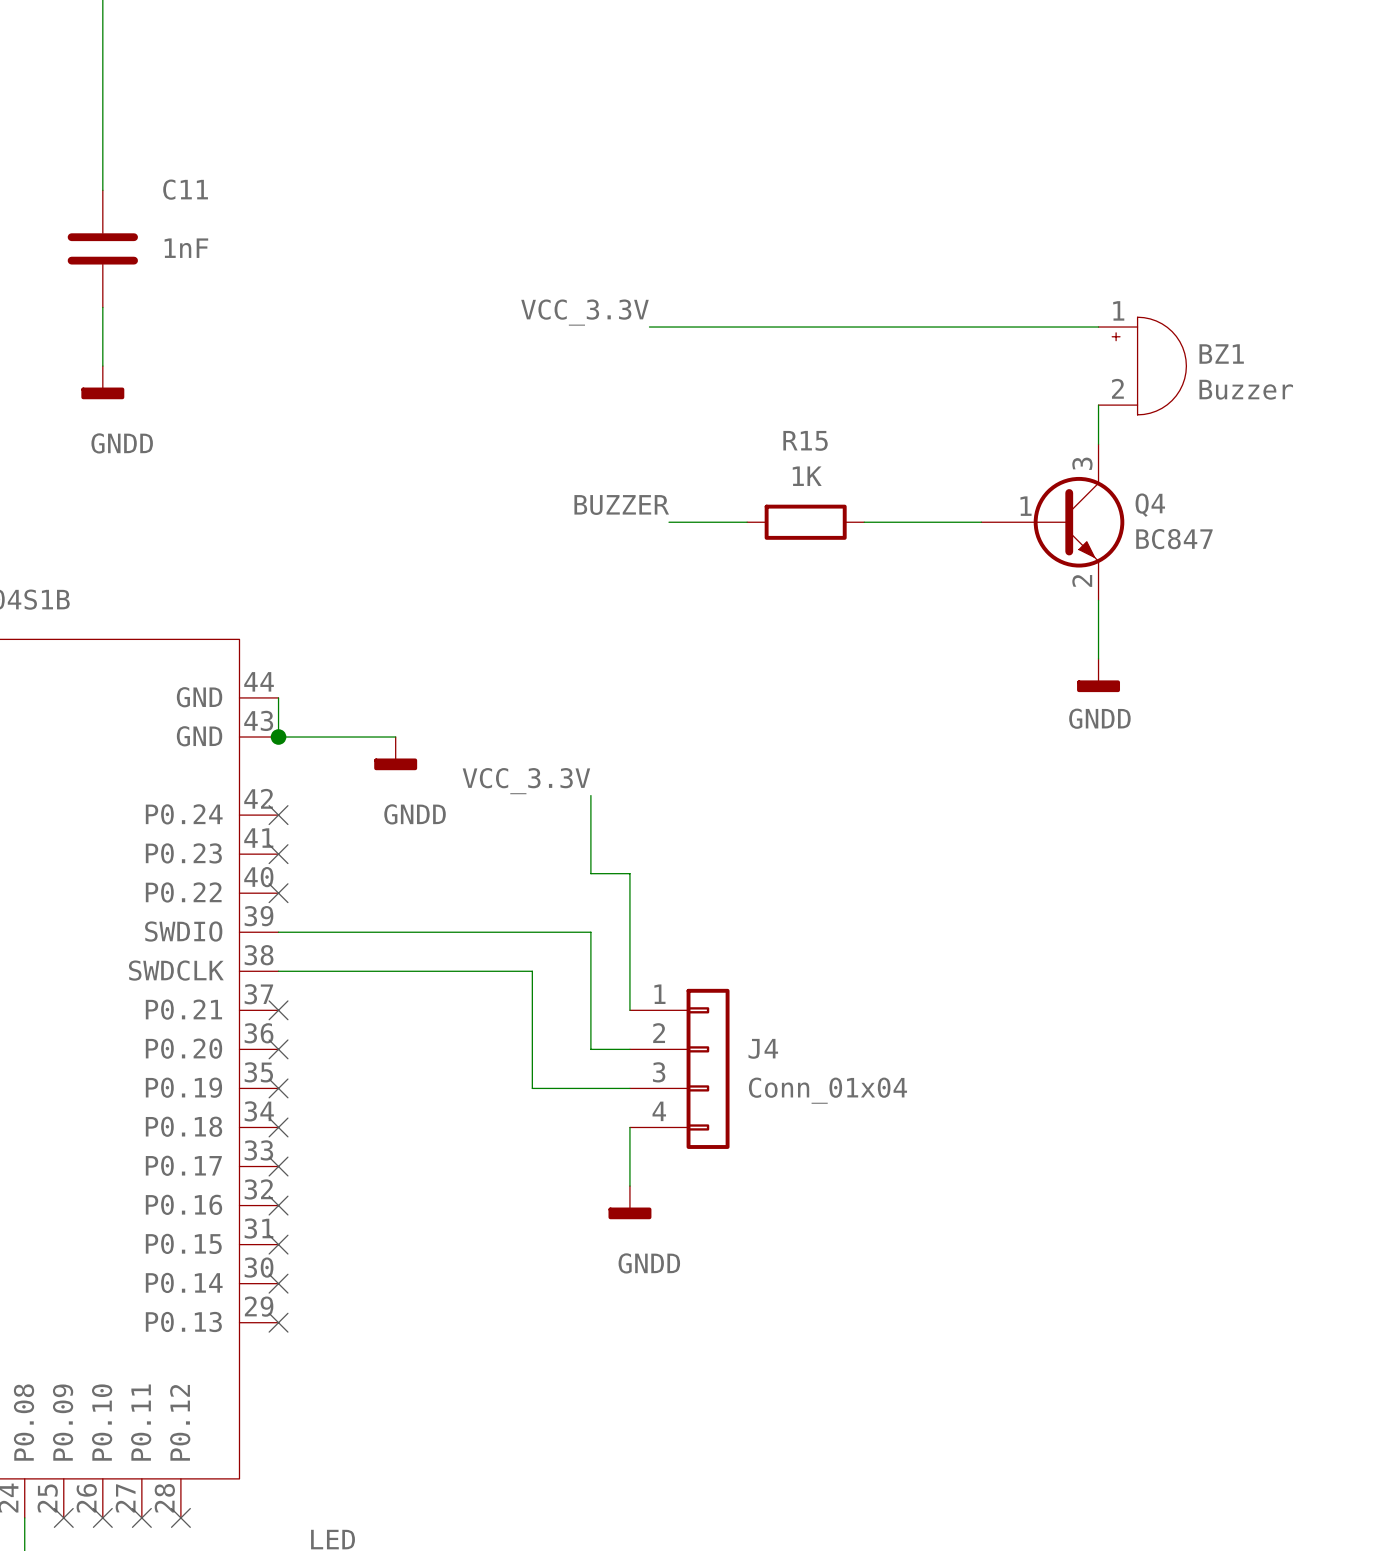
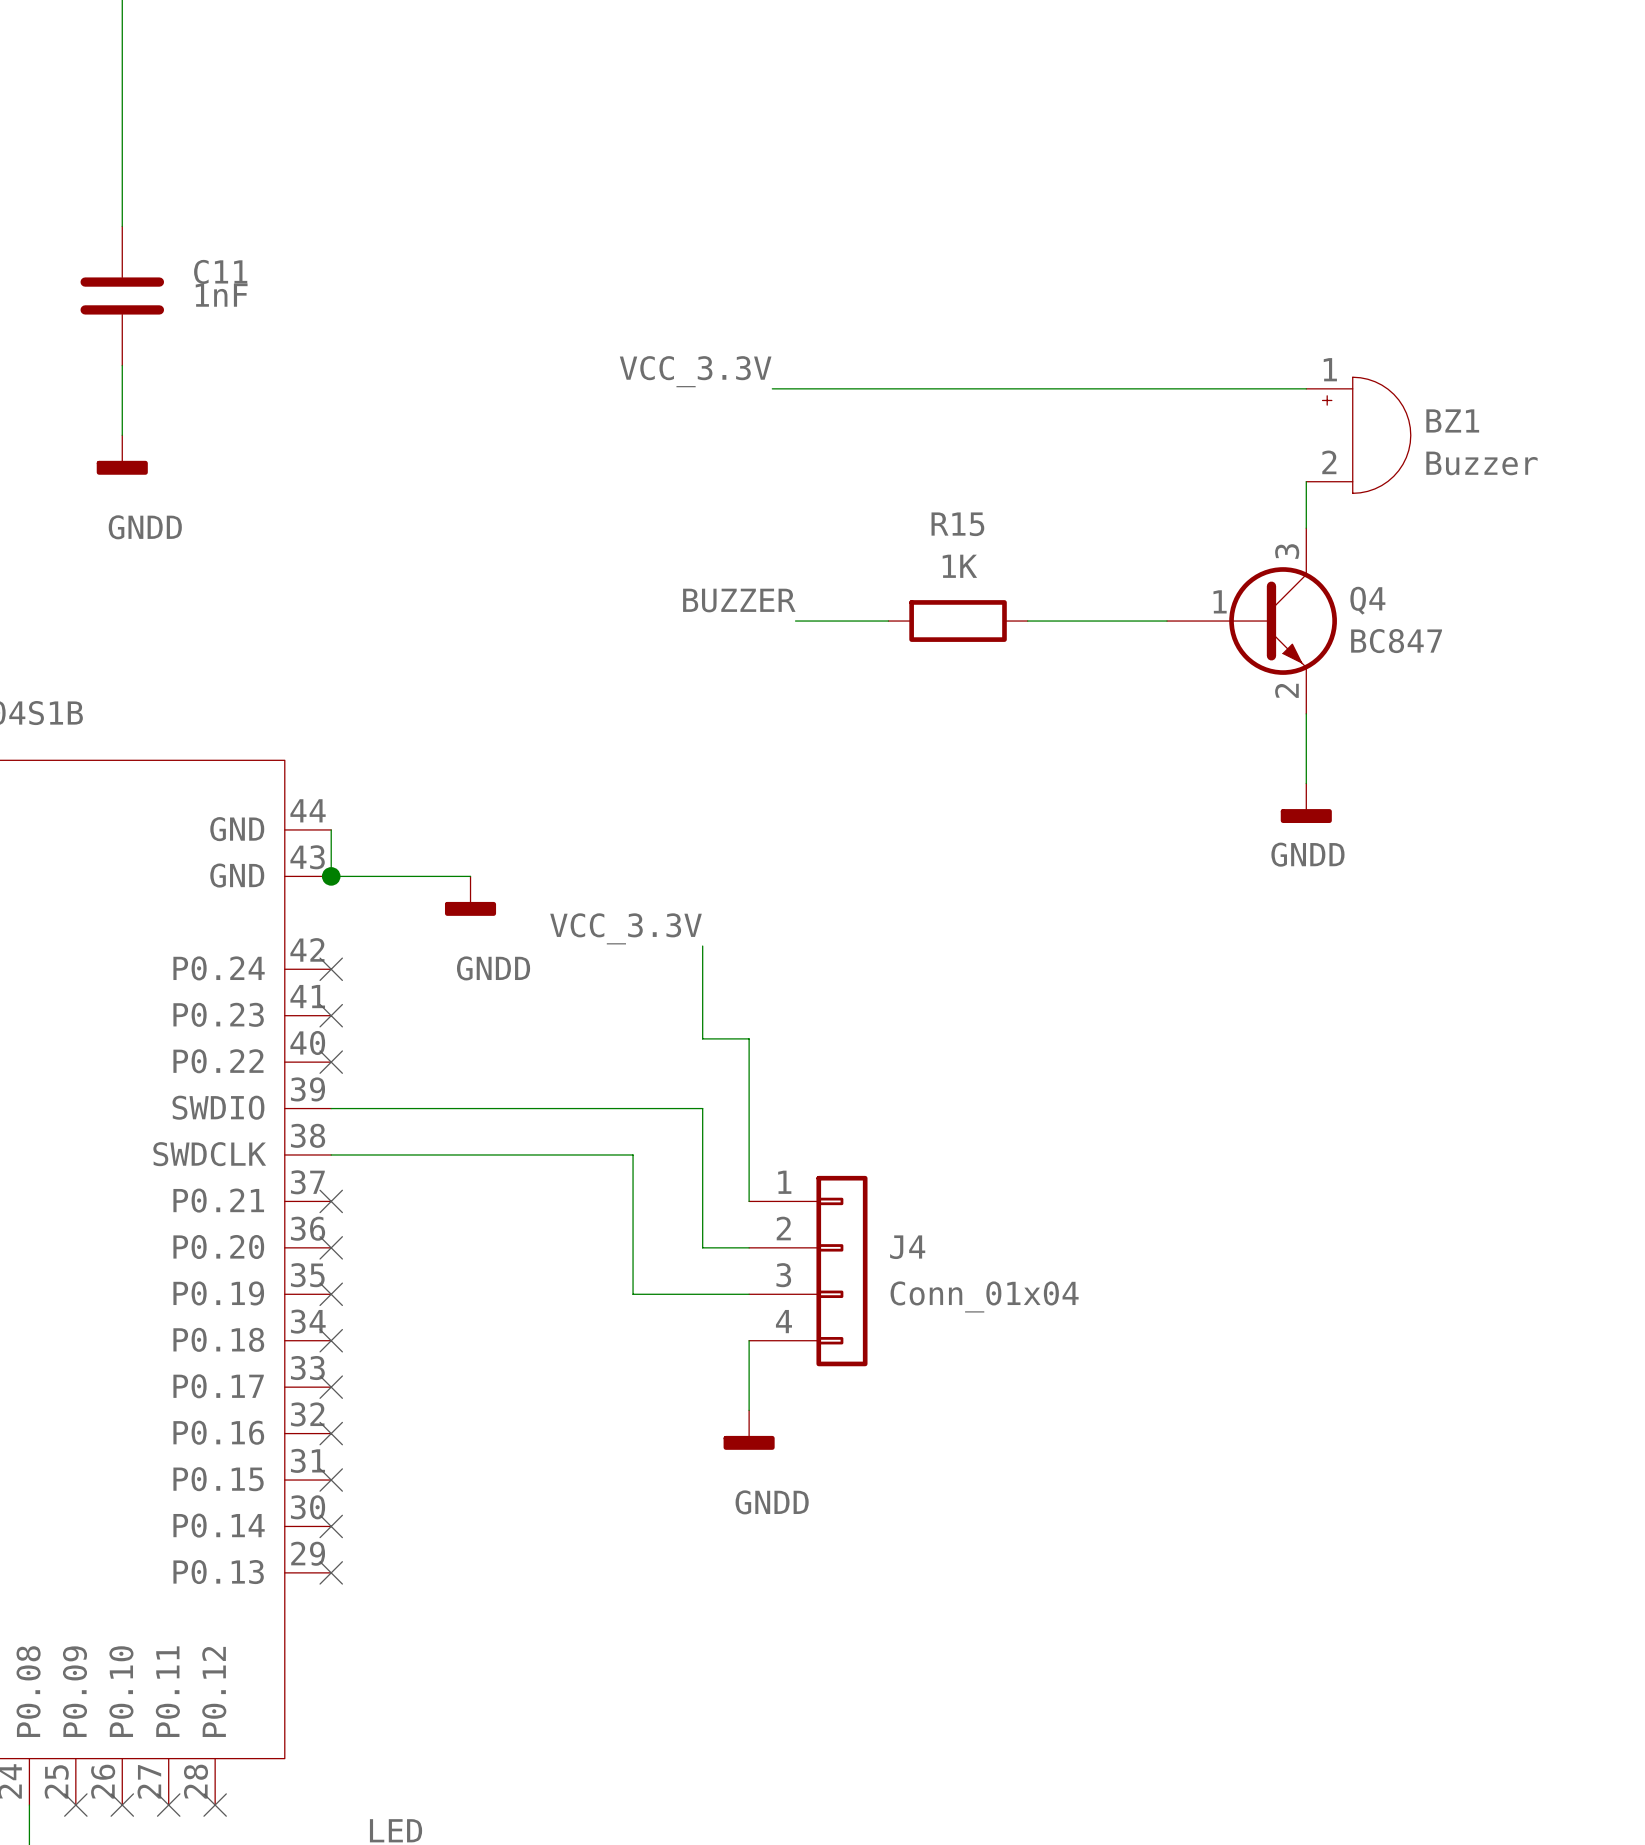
C11 name position: C11 (185, 189) -> C11 (220, 271)

